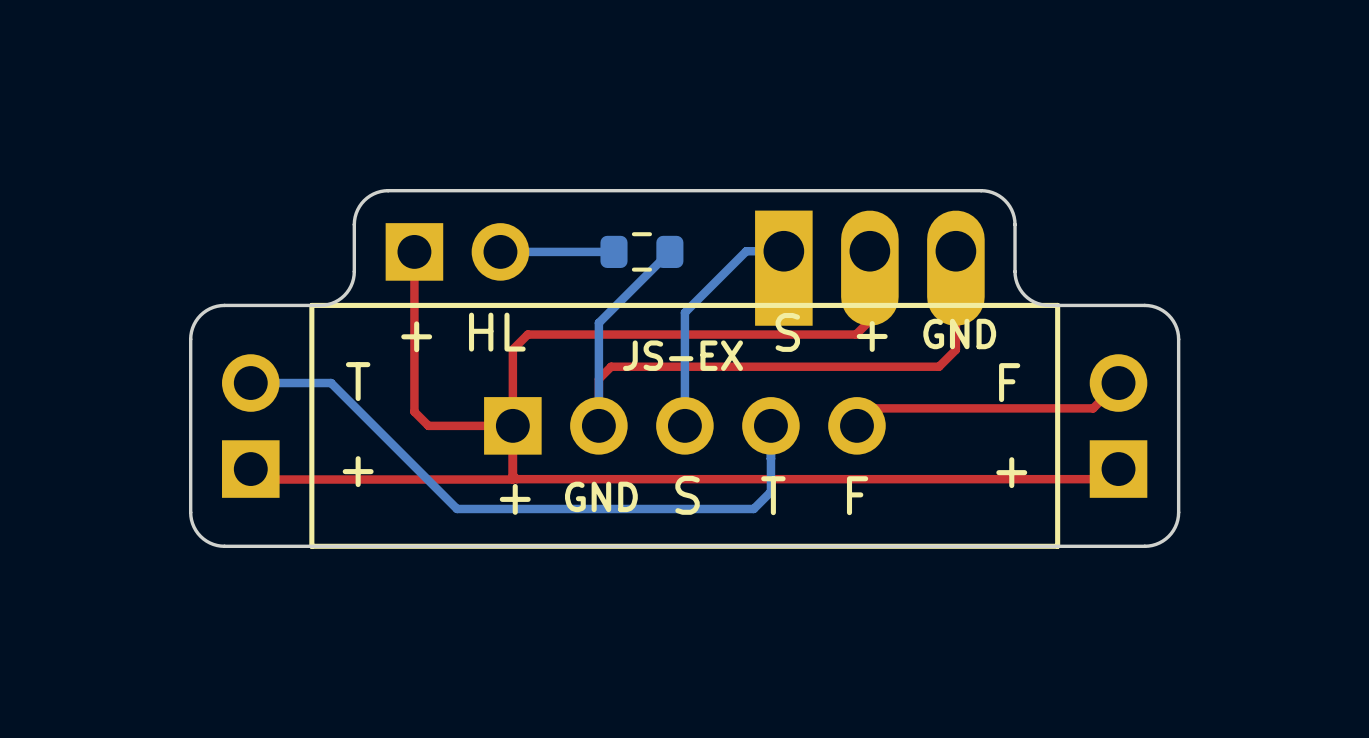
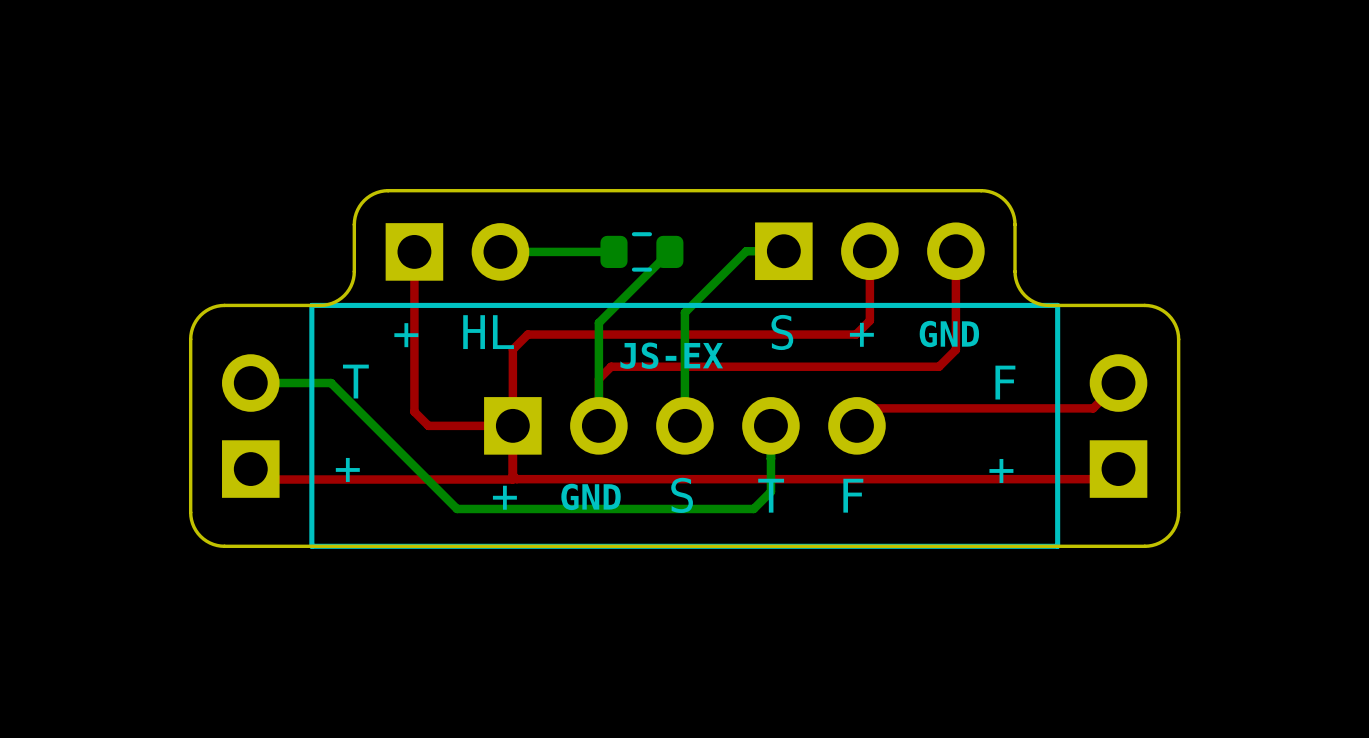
part footprint: [755, 210, 985, 326] -> [755, 222, 985, 281]

